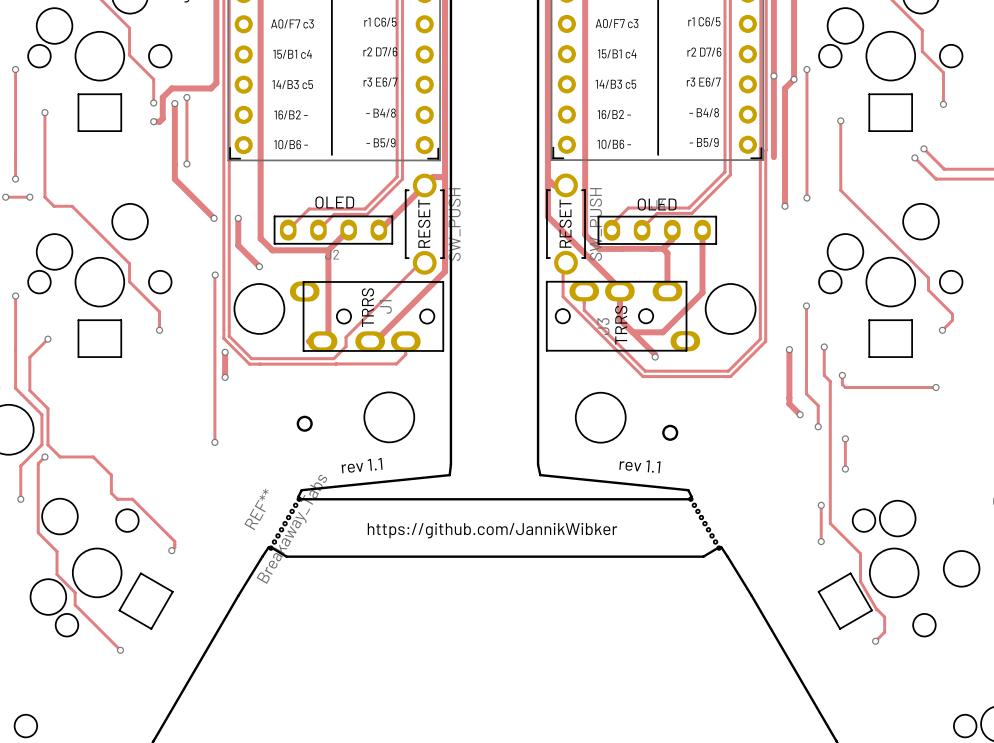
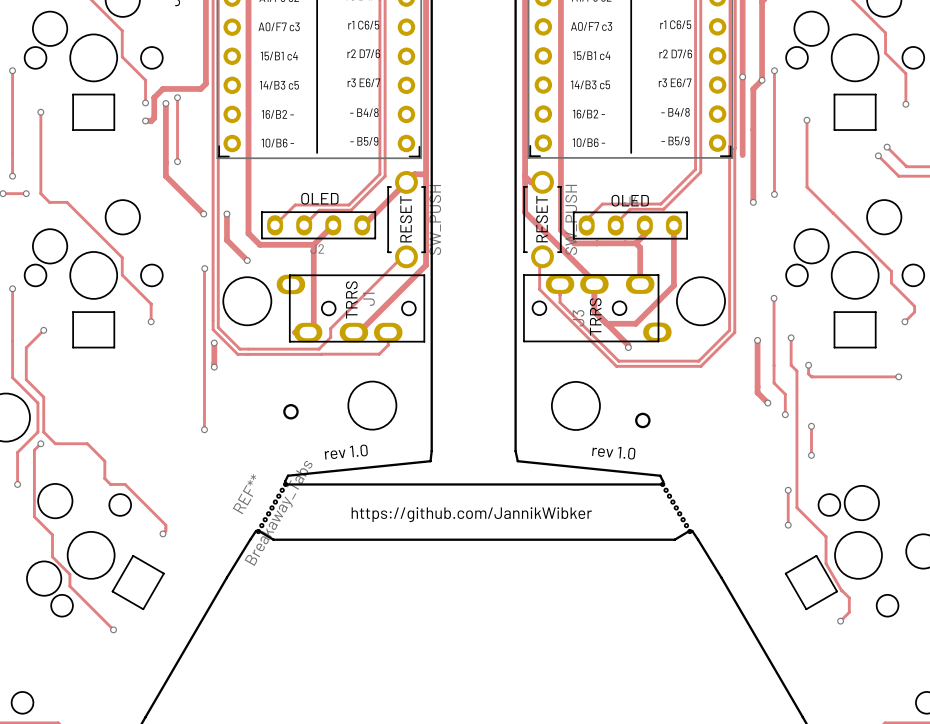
text: rev 1.1 (362, 465) -> rev 1.0 (346, 452)
text: rev 1.1 (639, 466) -> rev 1.0 (613, 453)

